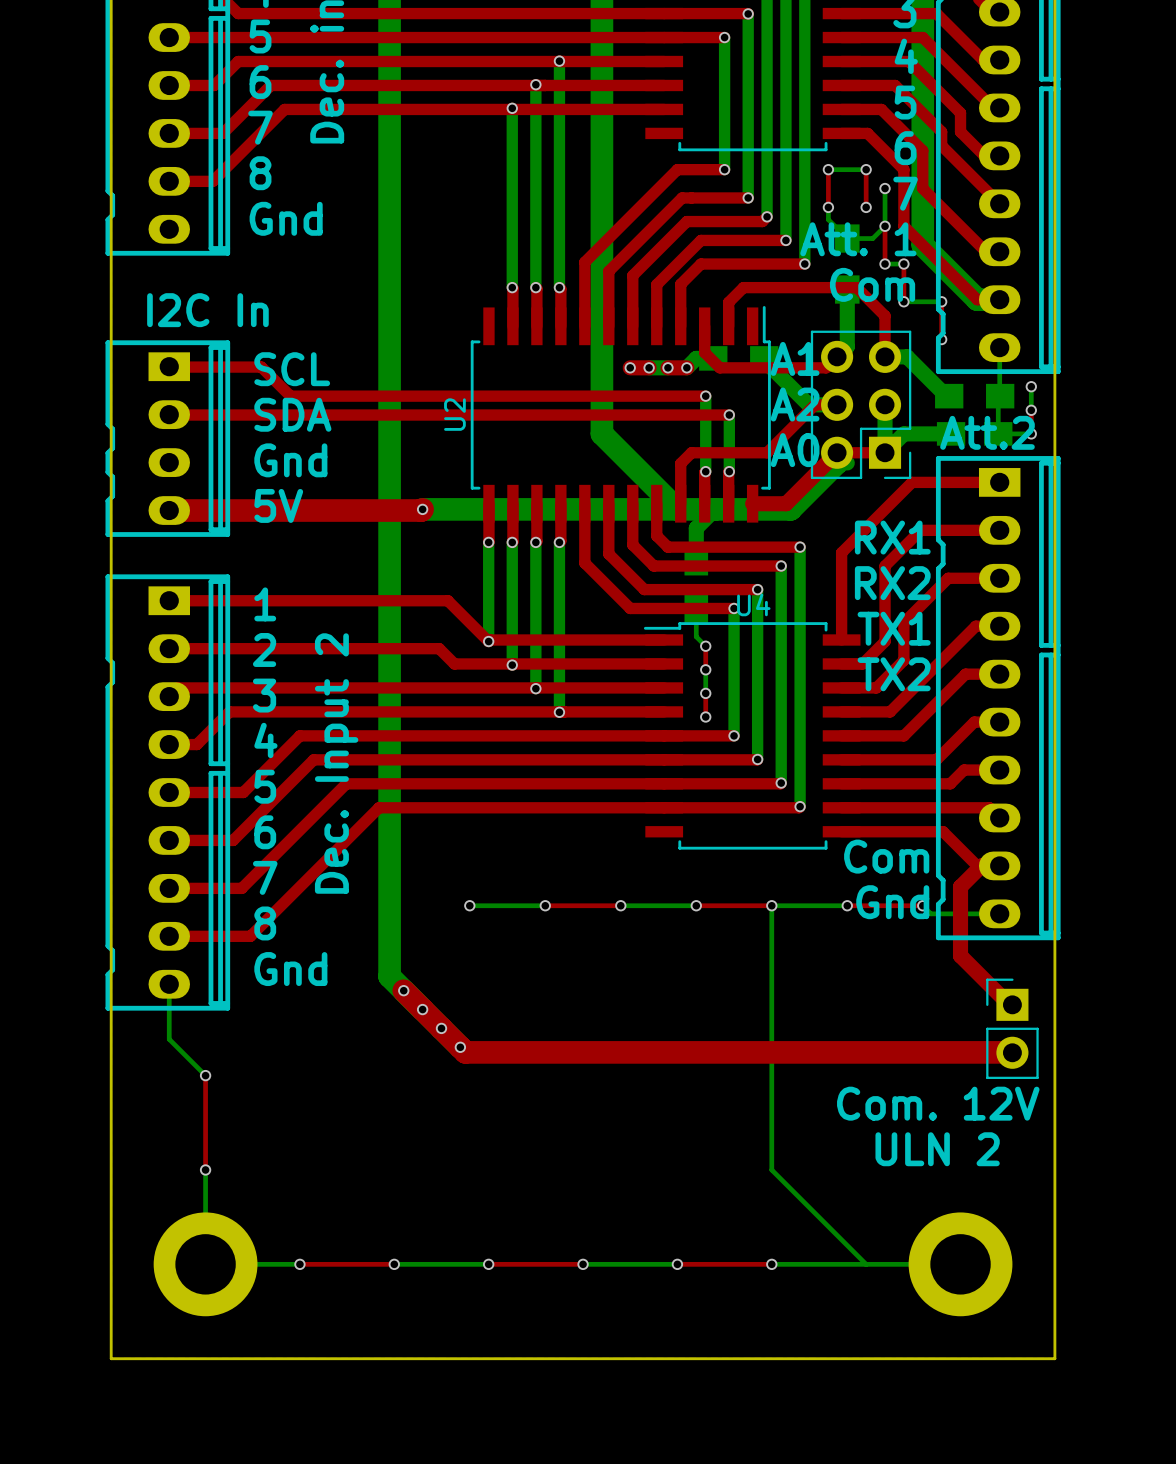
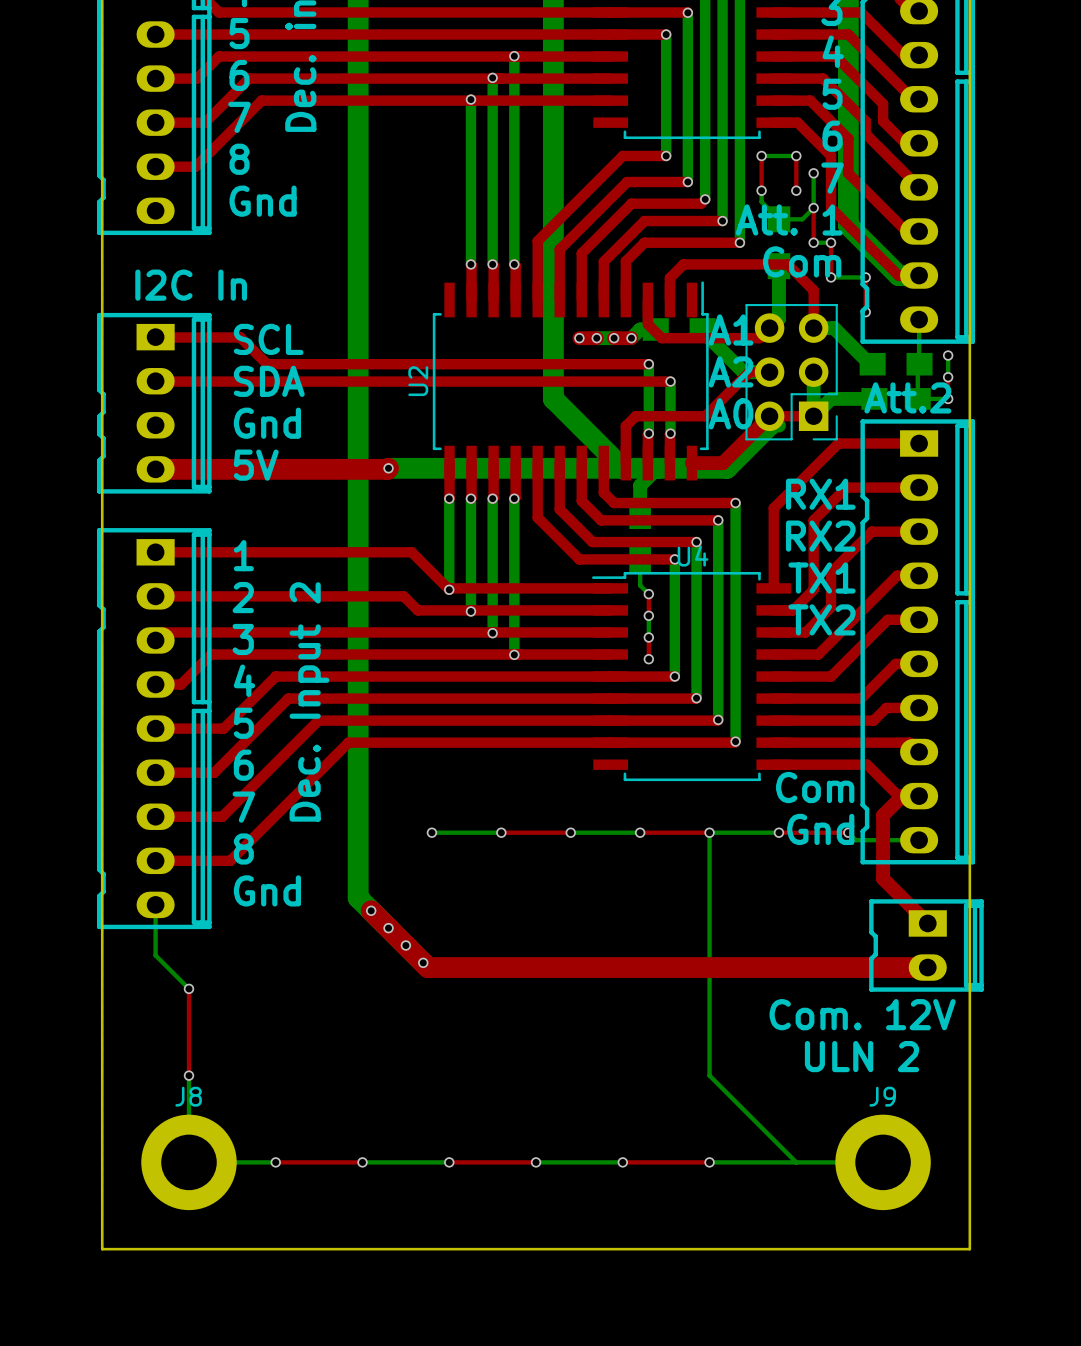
part footprint: [986, 978, 1039, 1080] -> [869, 899, 984, 992]
J8 name: none -> J8 (188, 1096)
J9 name: none -> J9 (882, 1096)

